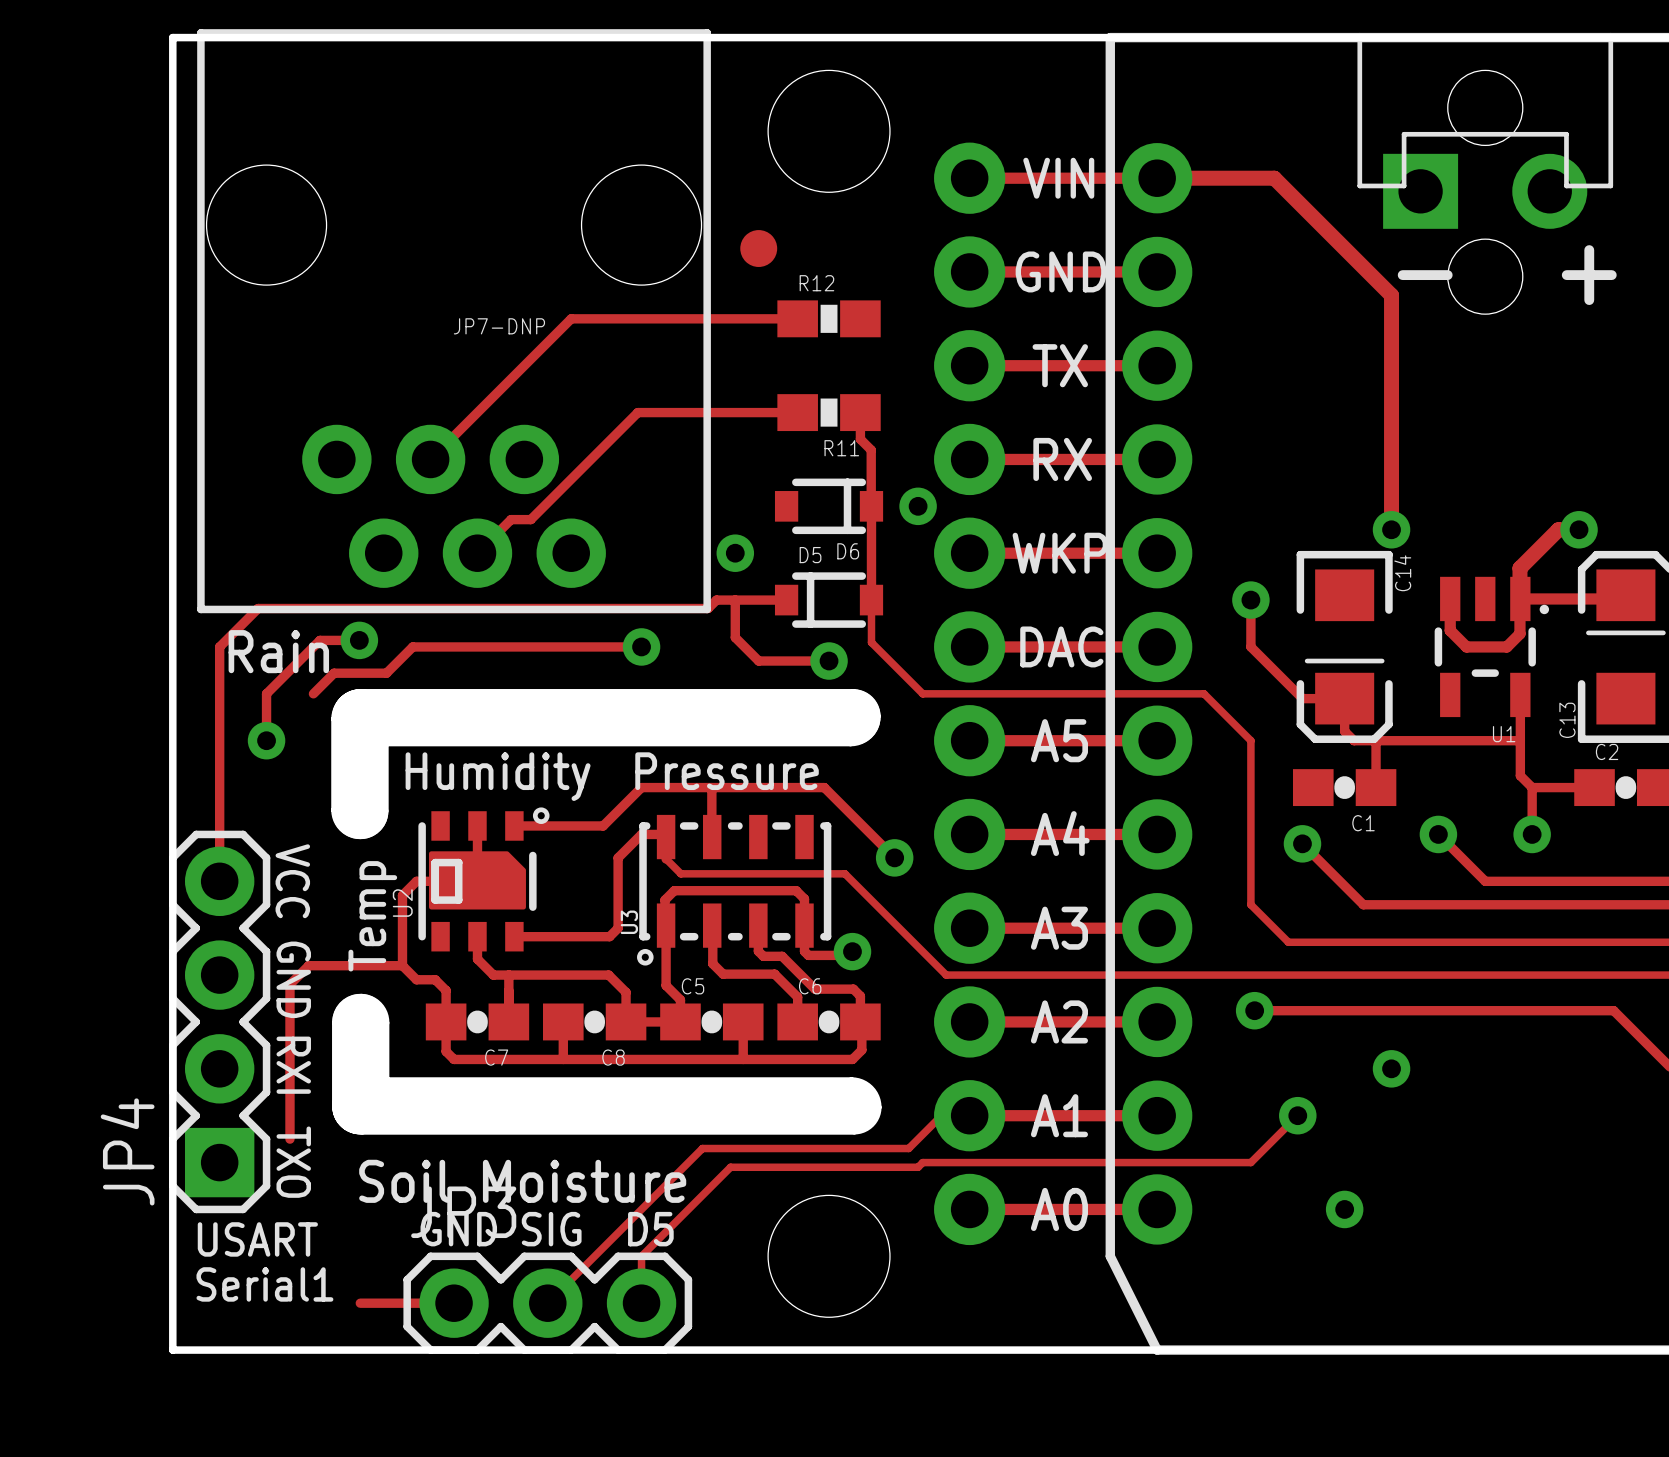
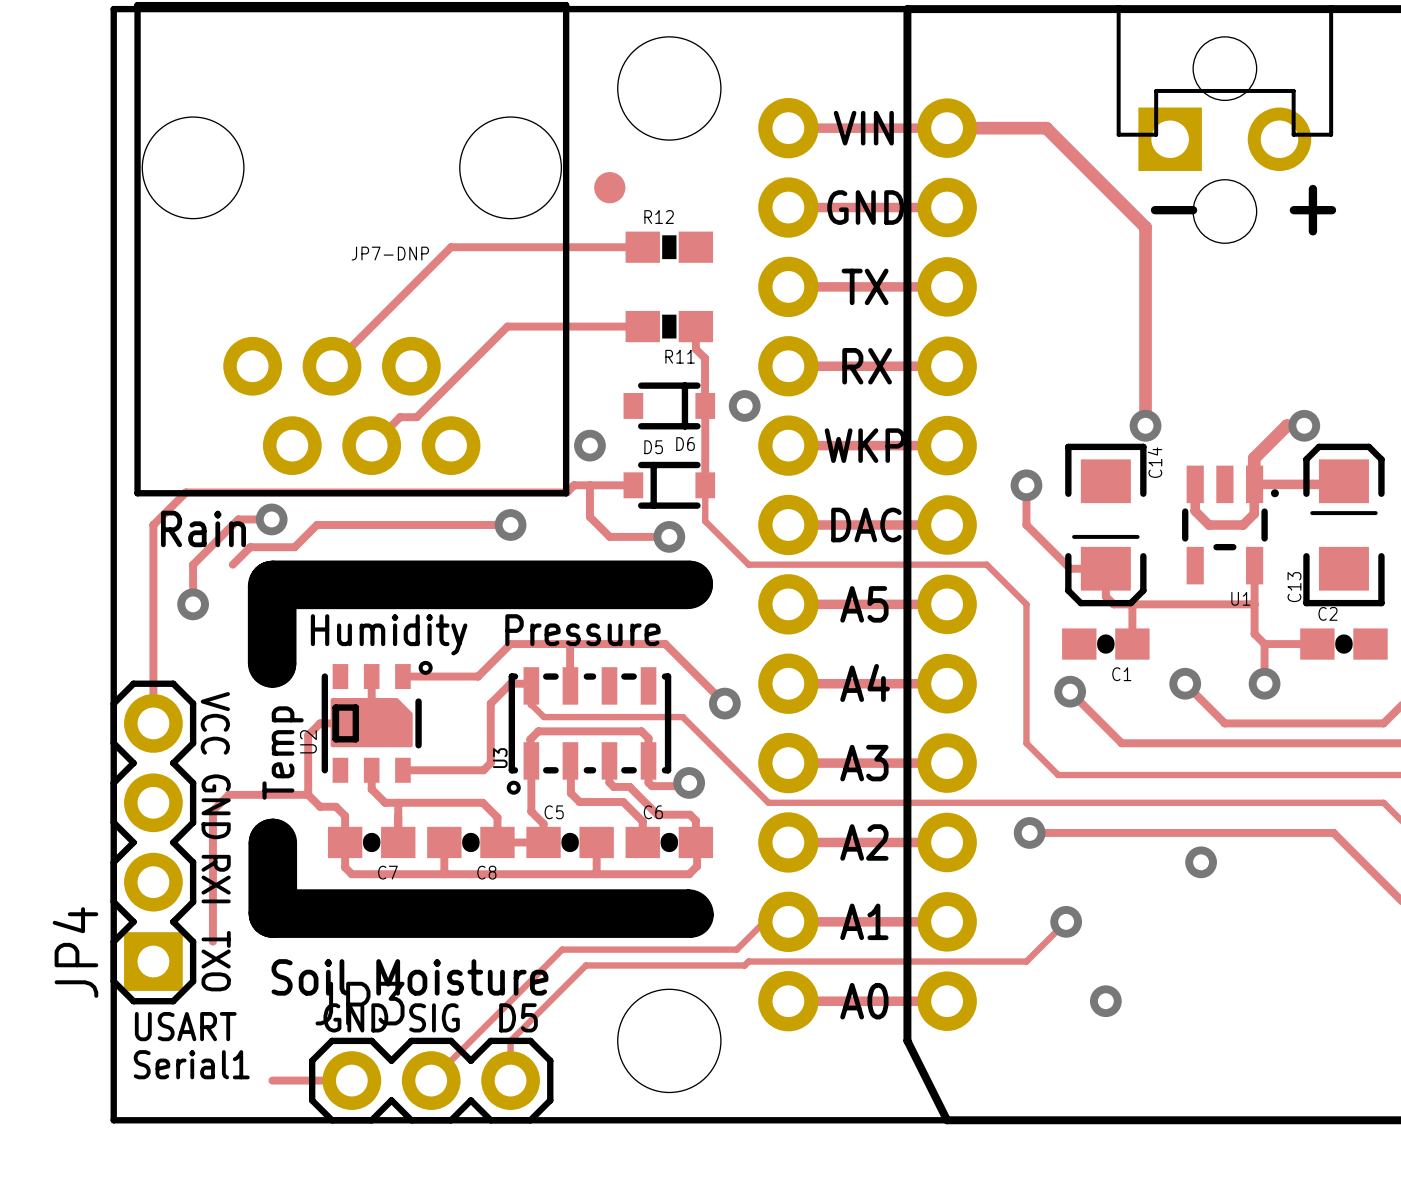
via position: (1391, 1068) -> (1201, 862)

